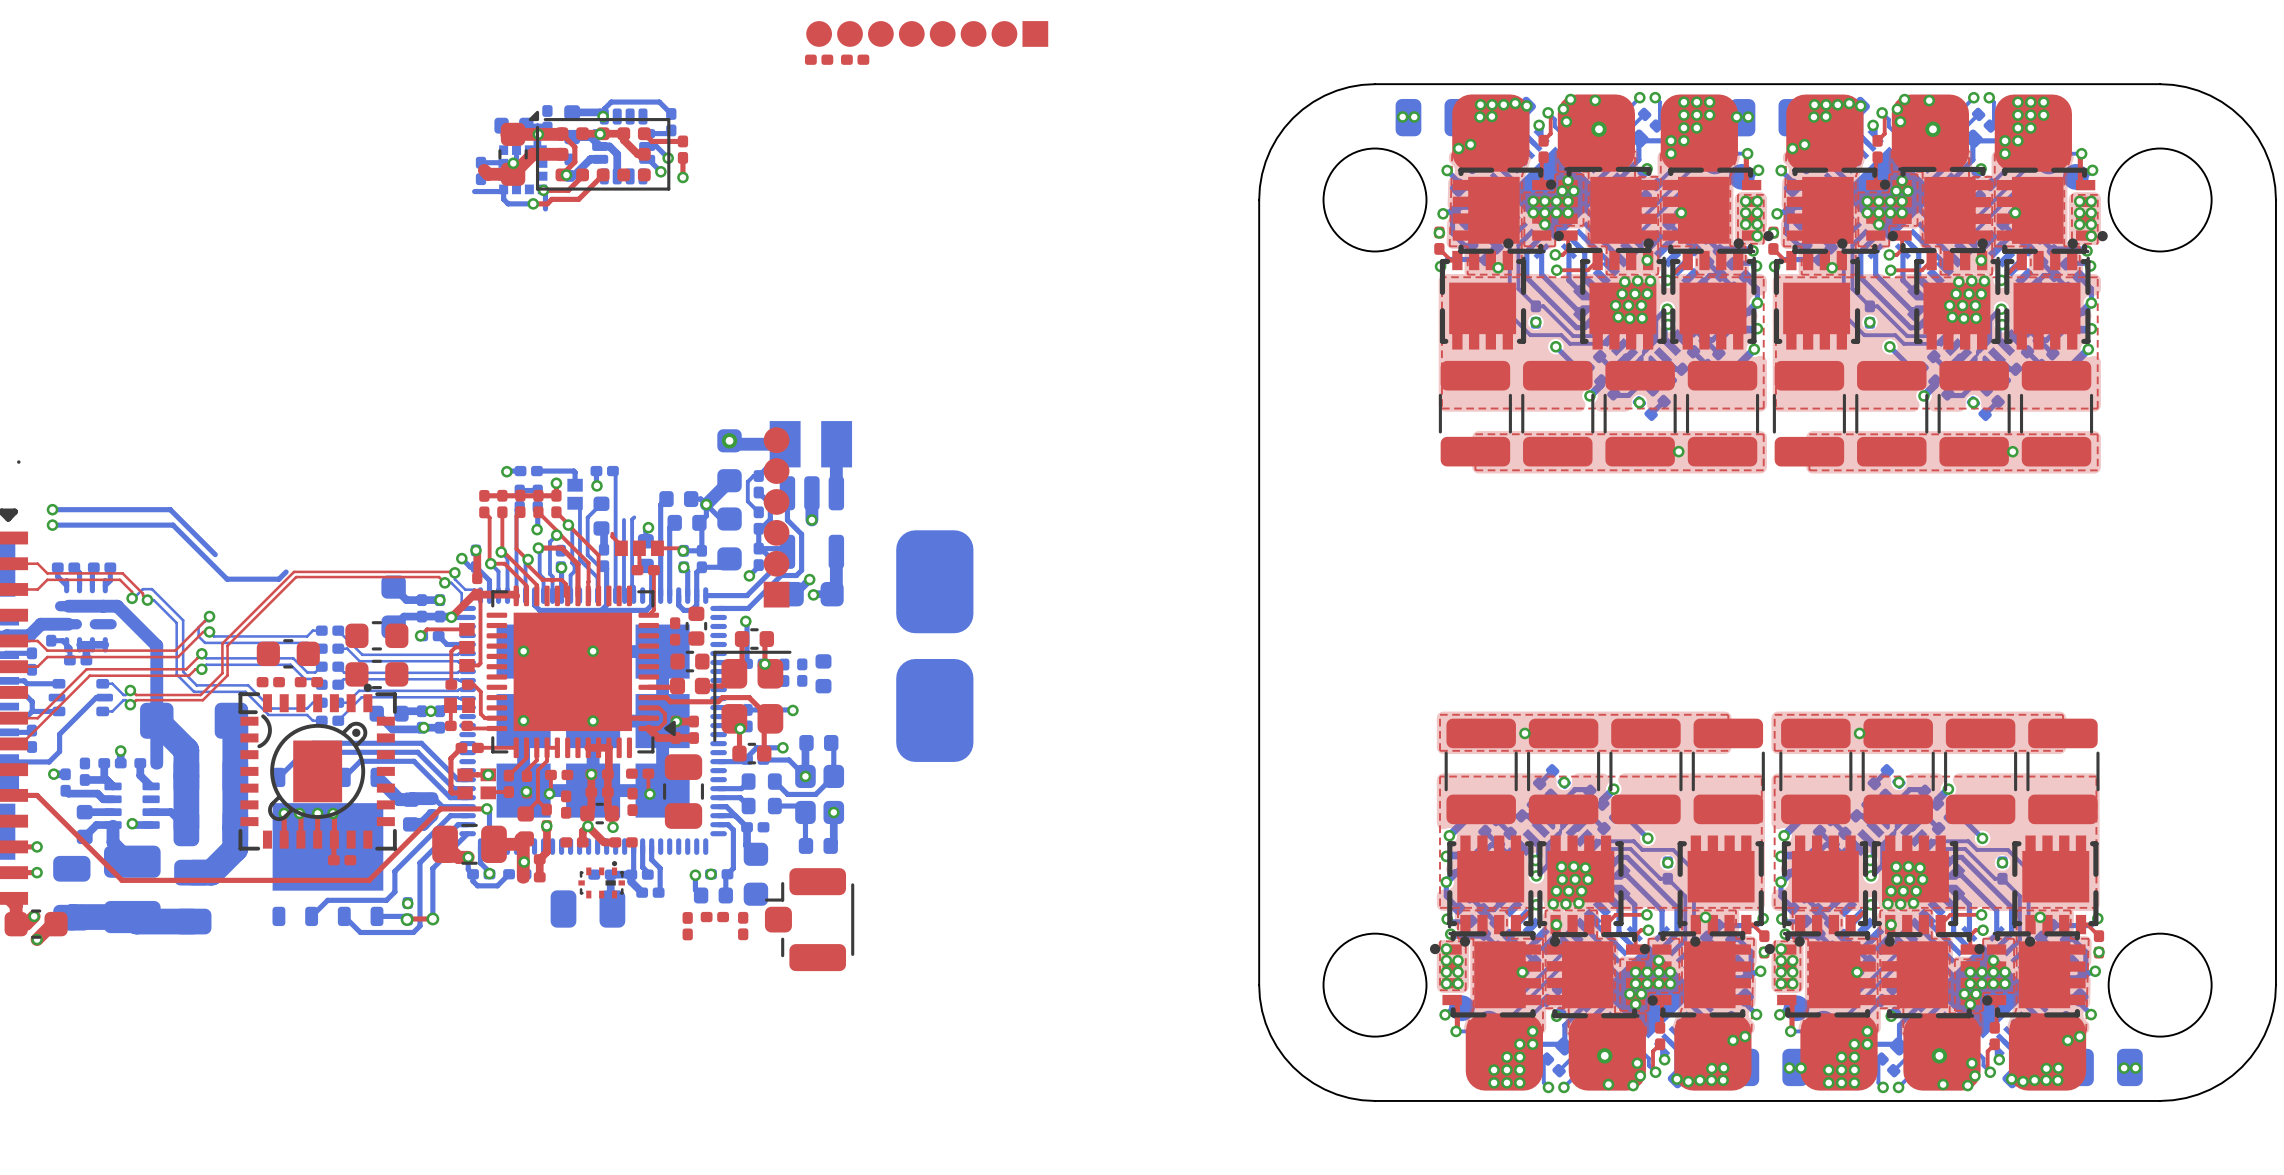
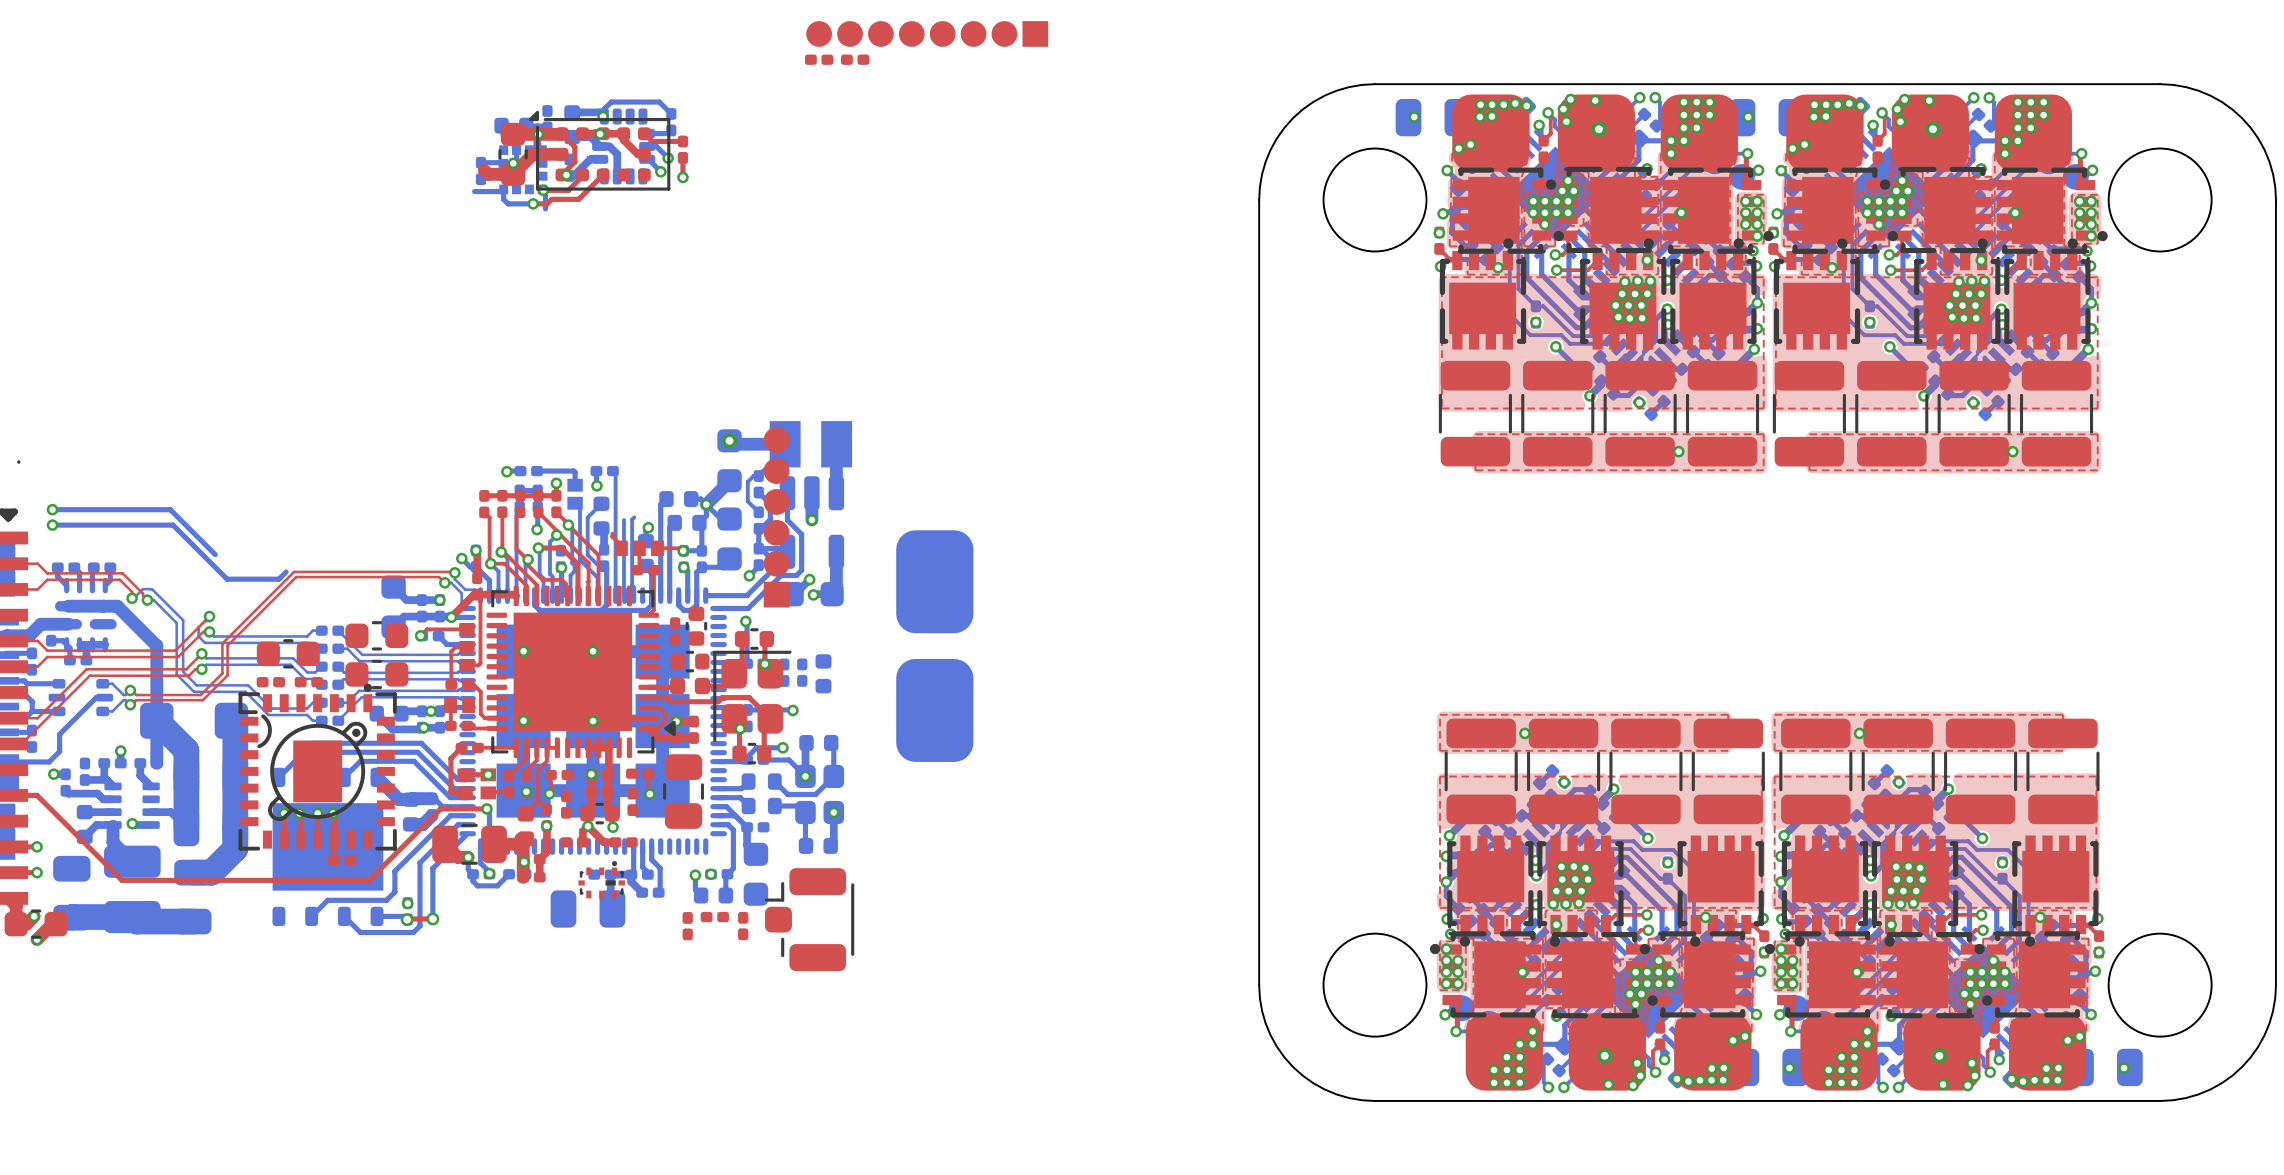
via: (1402, 116) -> none
via: (1736, 117) -> none
via: (1801, 1068) -> none
via: (2135, 1068) -> none

